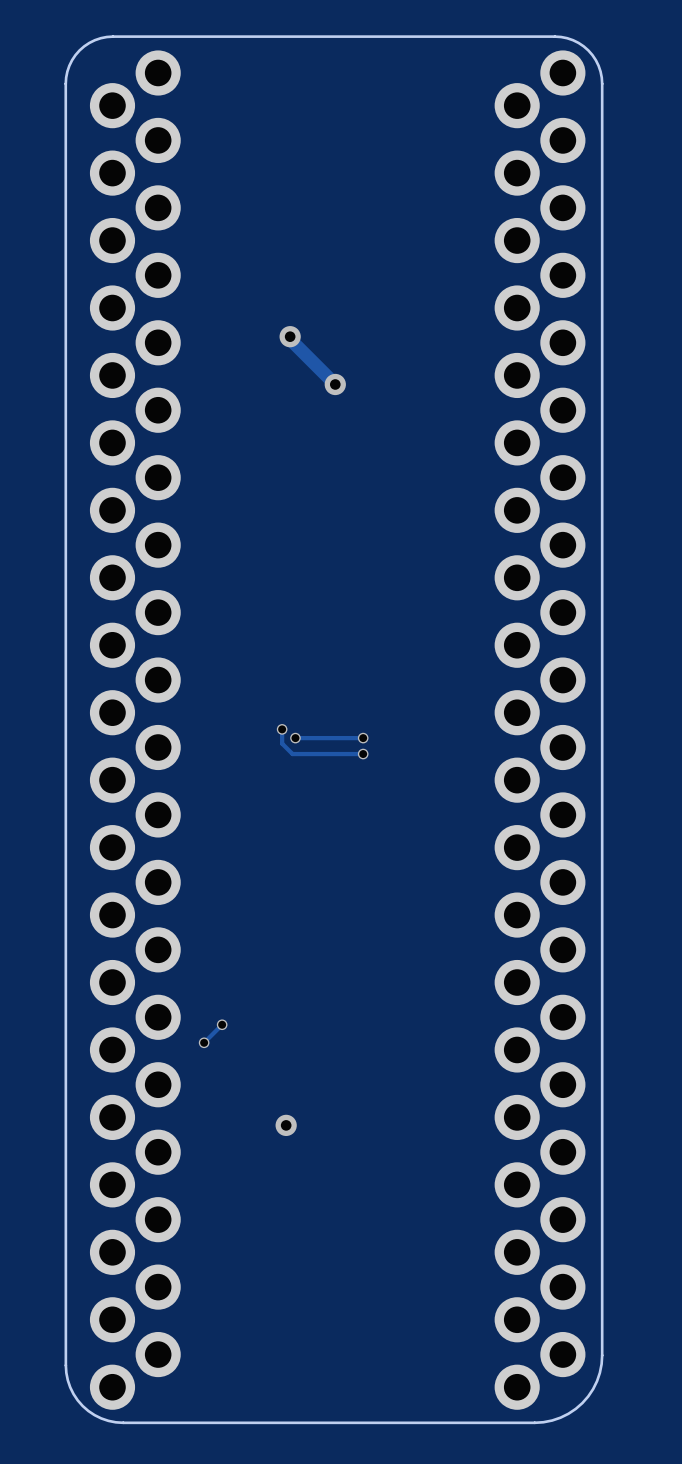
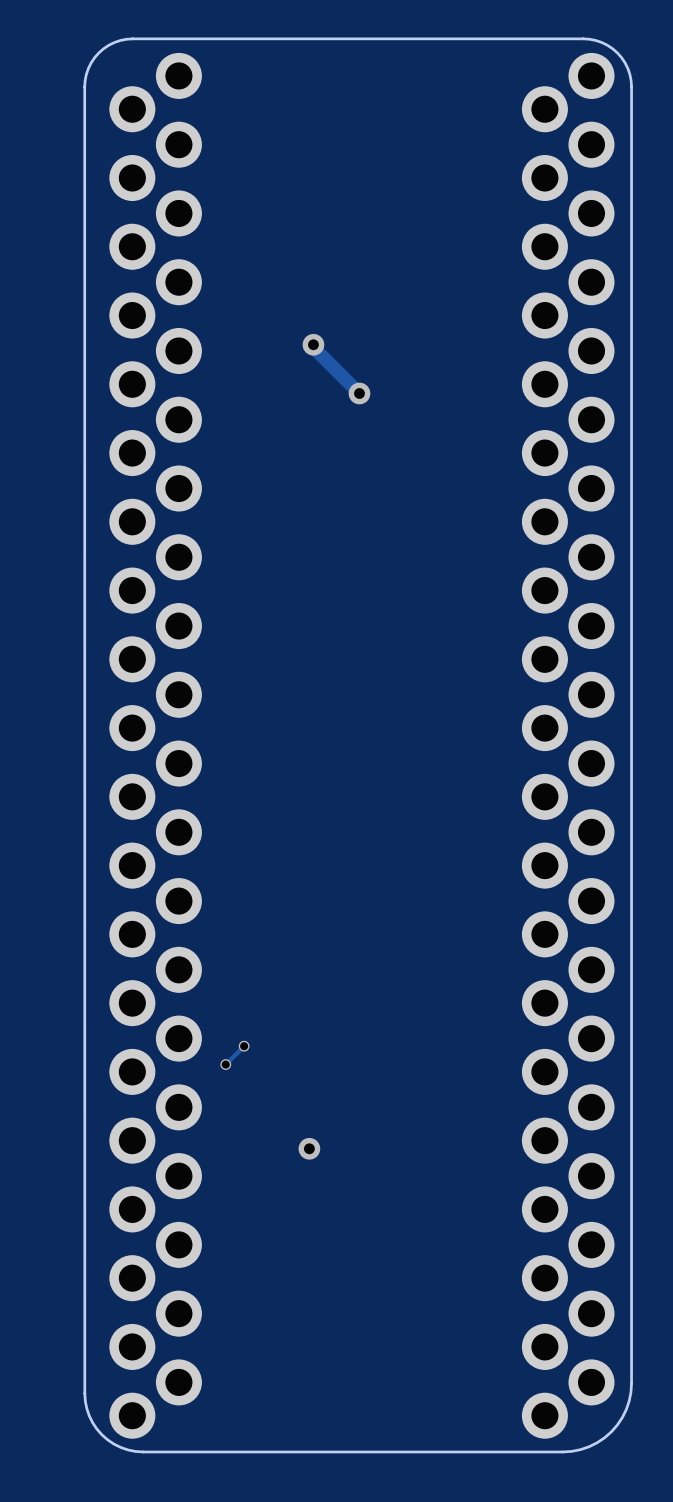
track: (282, 729) (282, 743) (292, 754) (363, 754) -> none
via: (282, 729) -> none
via: (295, 738) -> none
track: (363, 738) (295, 738) -> none
via: (363, 738) -> none
via: (363, 754) -> none

